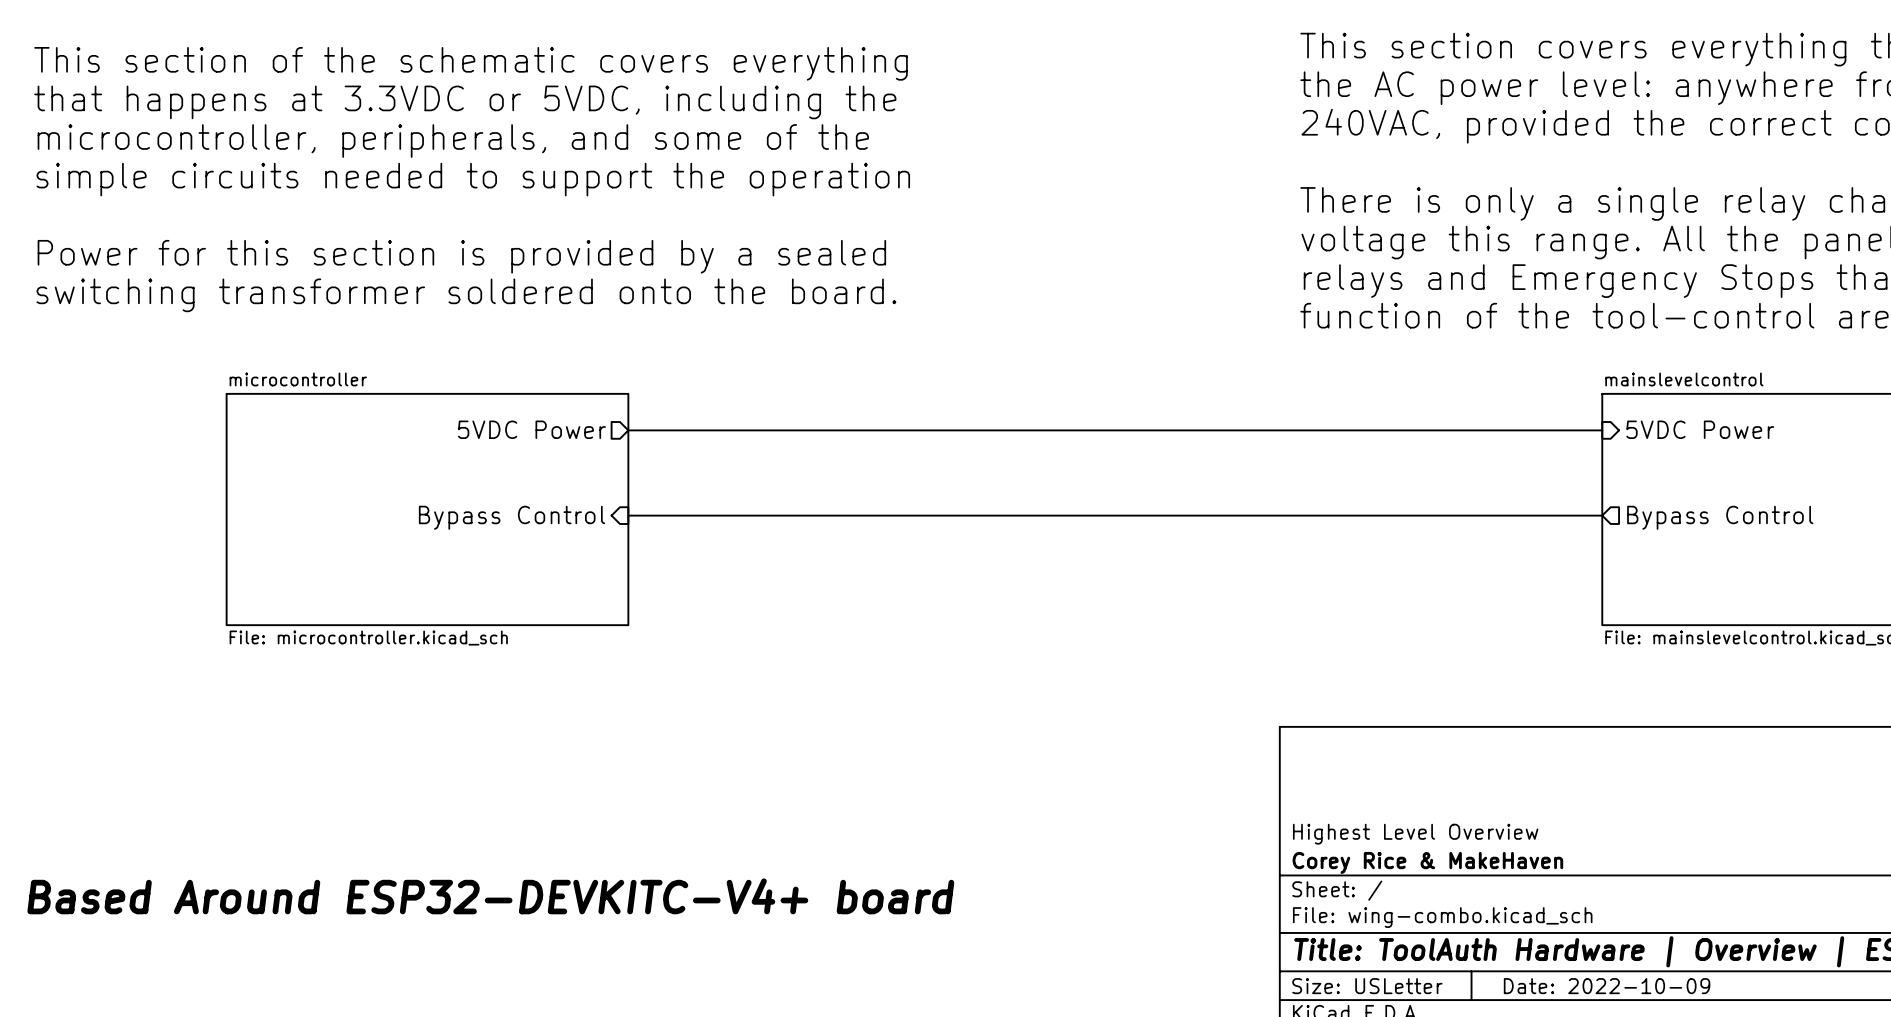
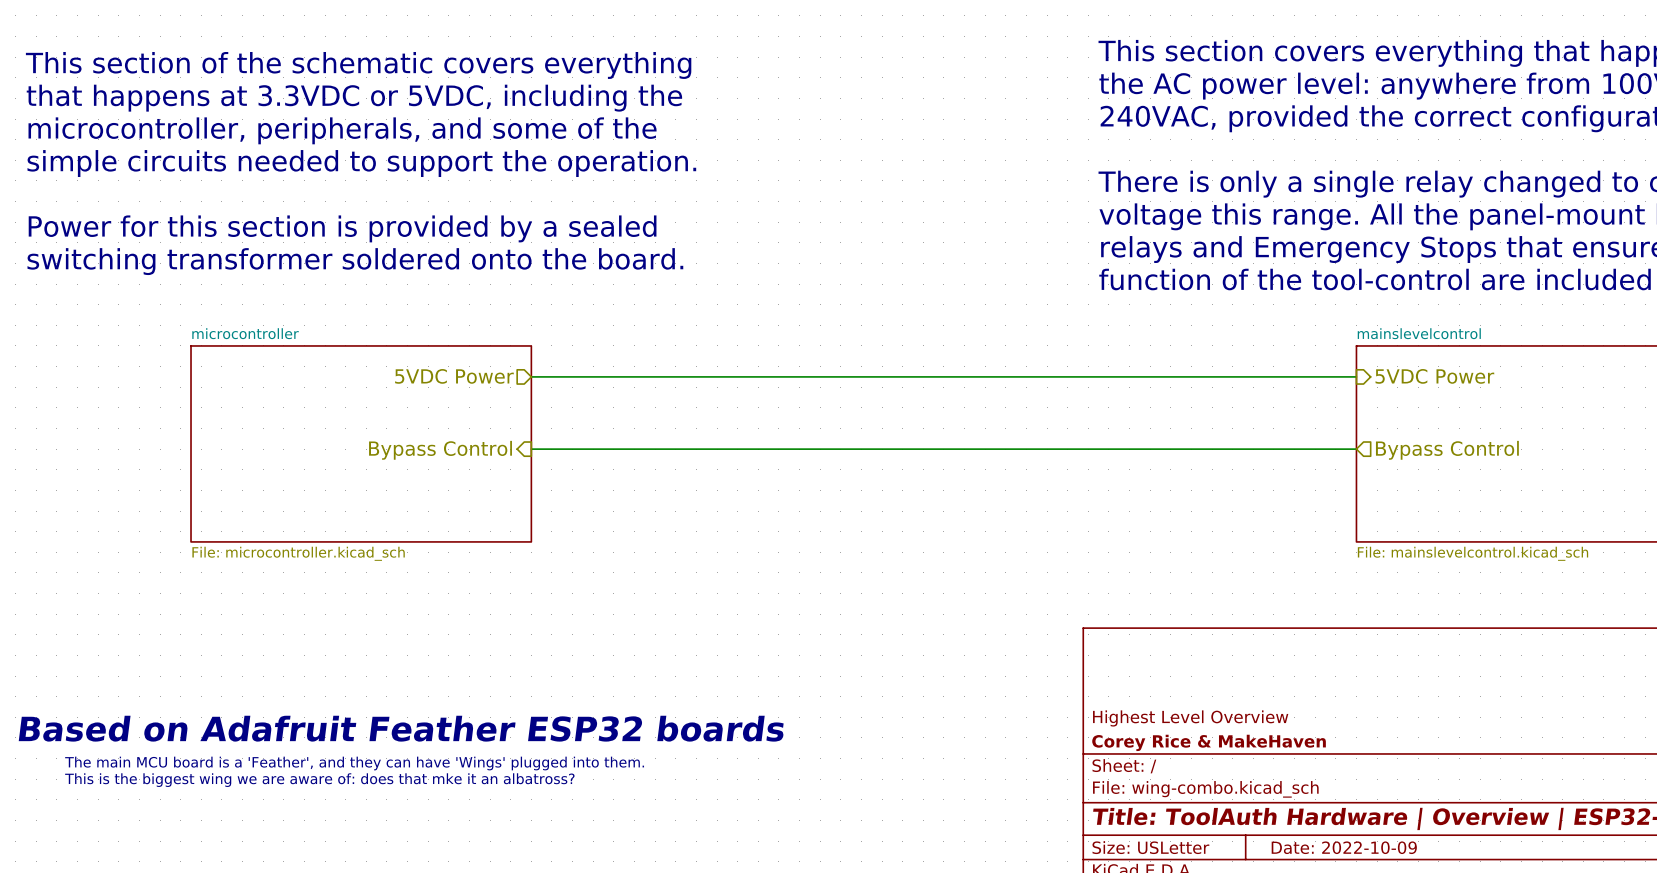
text: simple circuits needed to support the operation (473, 179) -> simple circuits needed to support the operation. (361, 163)
text: none -> Based on Adafruit Feather ESP32 boards (401, 728)
text: none -> The main MCU board is a 'Feather', and they can have 'Wings' plugged into them. (354, 763)
text: Based Around ESP32-DEVKITC-V4+ board (490, 896) -> none
text: none -> This is the biggest wing we are aware of: does that mke it an albatross? (319, 780)

